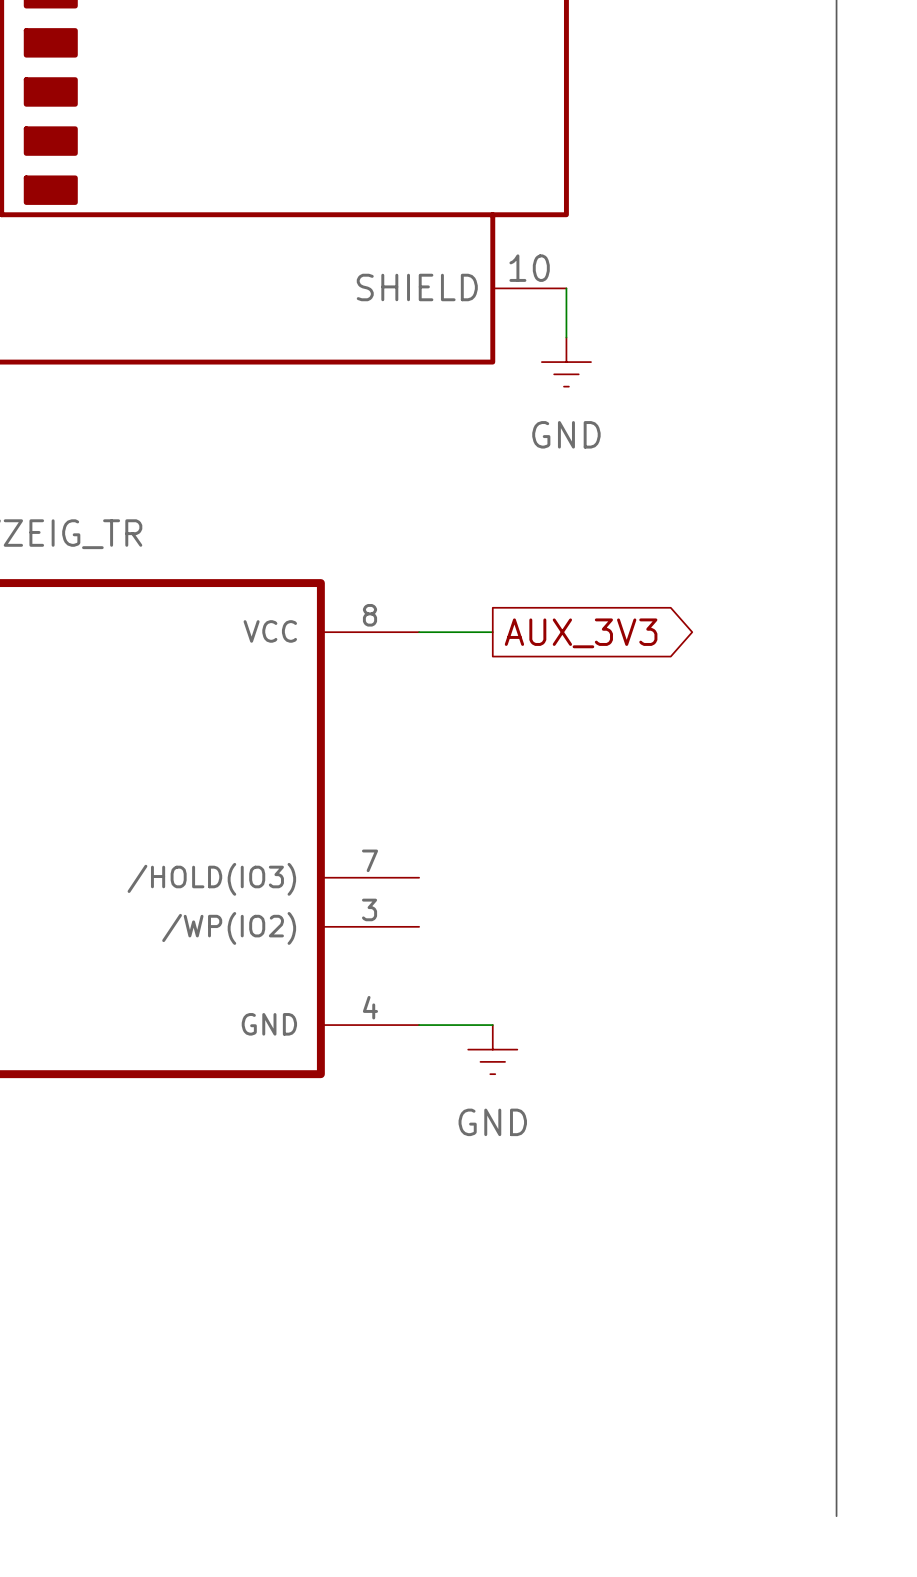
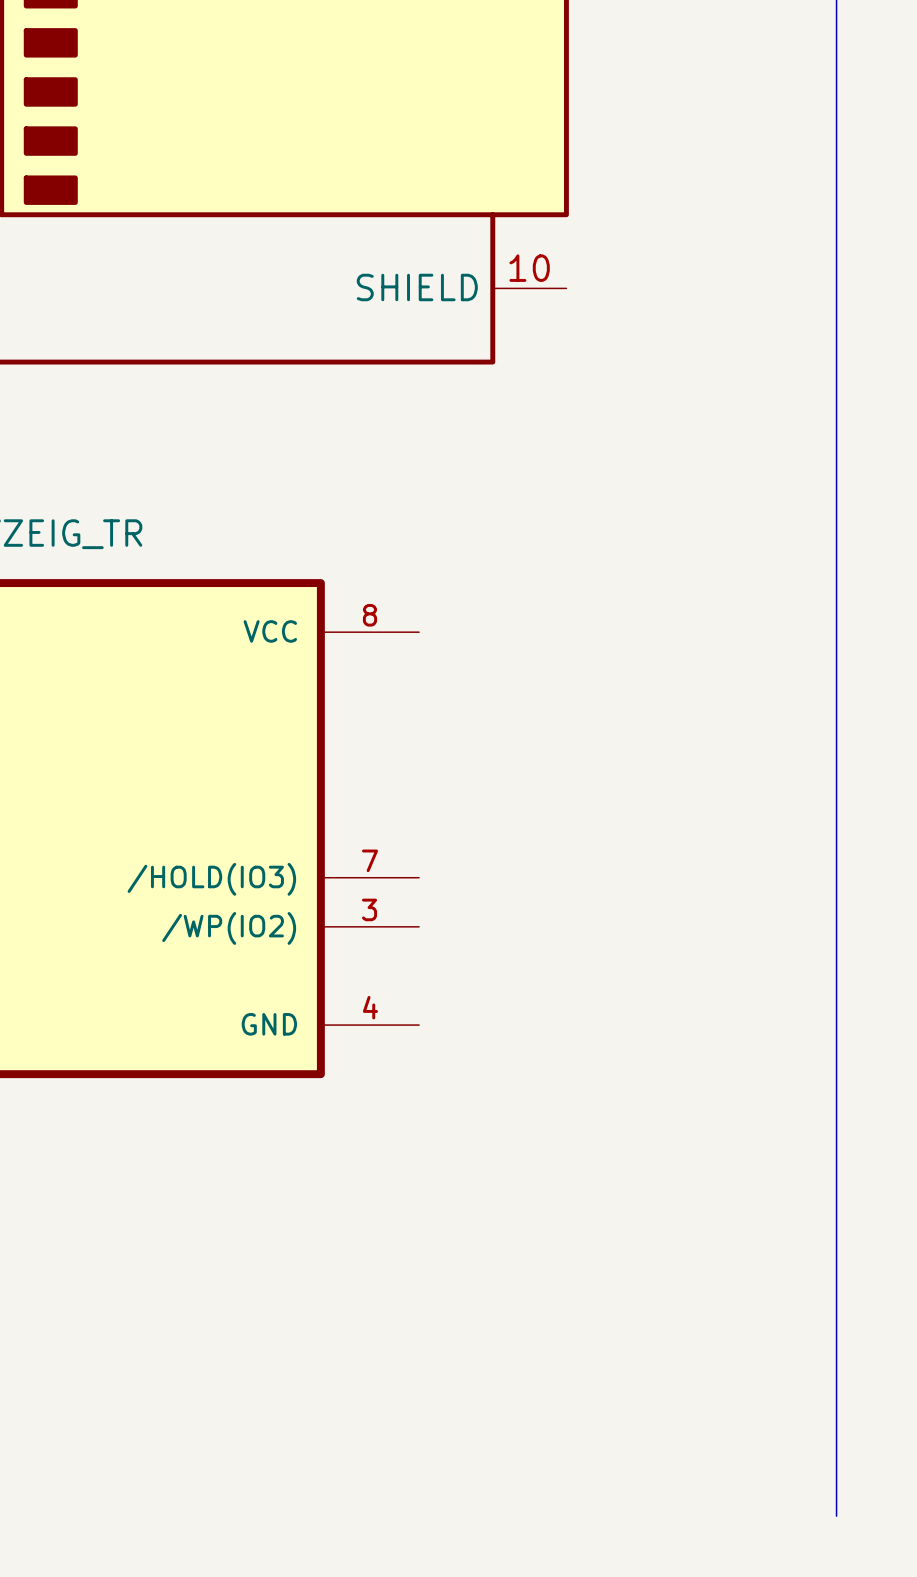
wire: (566, 288) (566, 337) -> none
power symbol: GND (566, 362) -> none
wire: (419, 632) (492, 632) -> none
global label: AUX_3V3 (581, 633) -> none
wire: (419, 1025) (492, 1025) -> none
power symbol: GND (492, 1049) -> none

